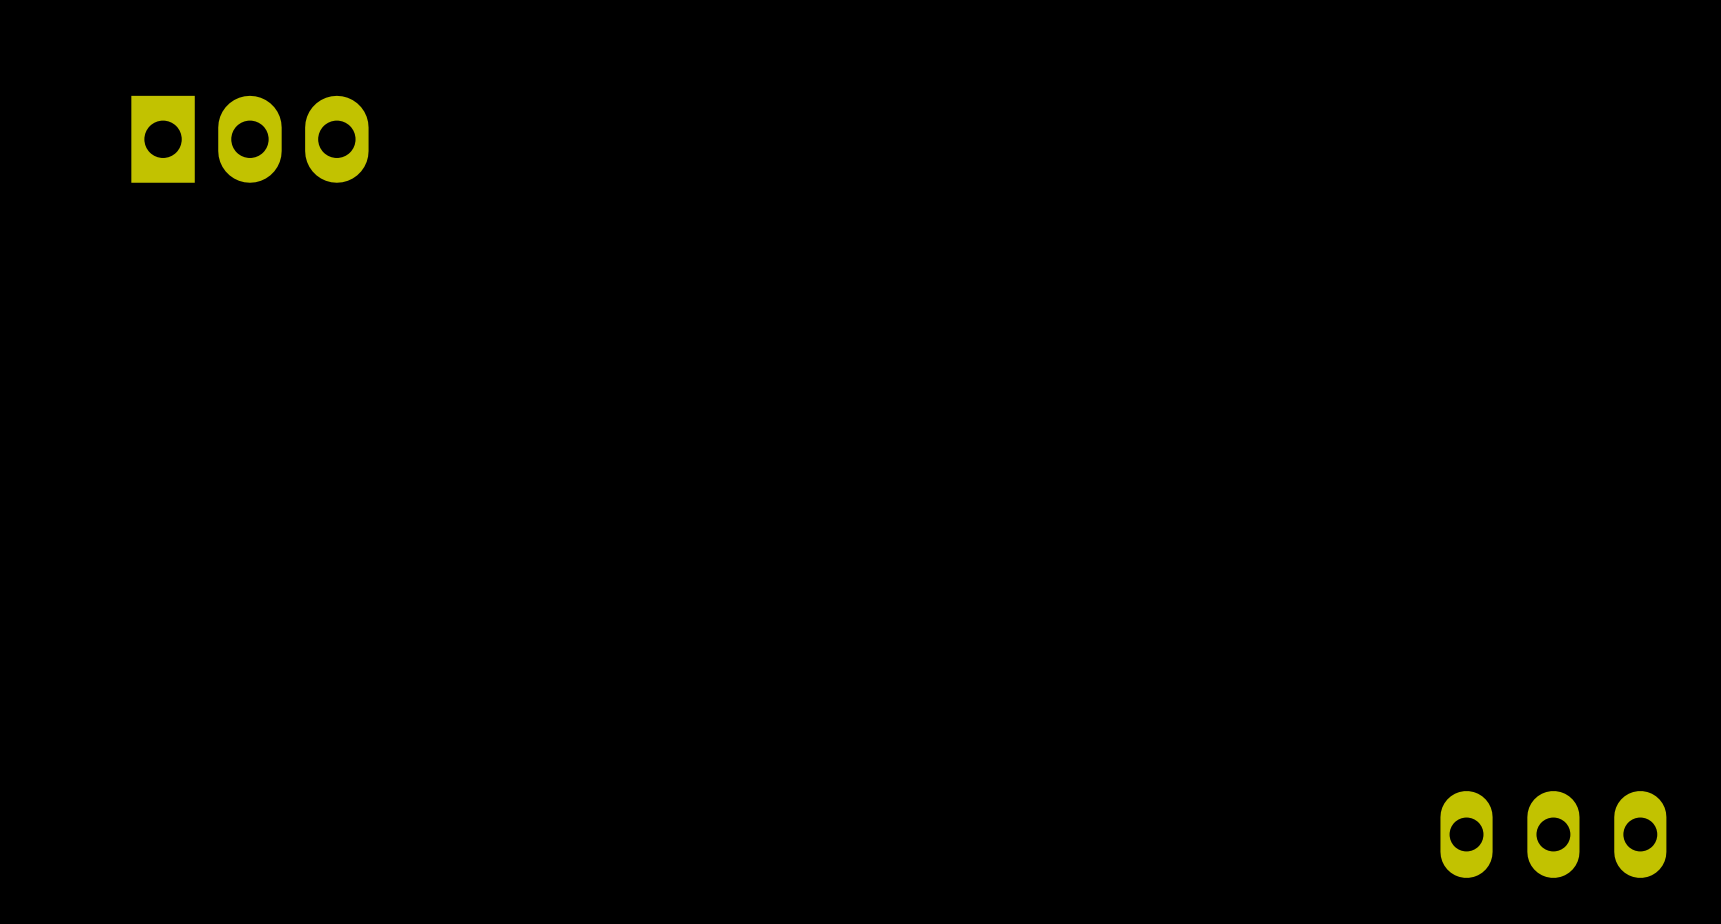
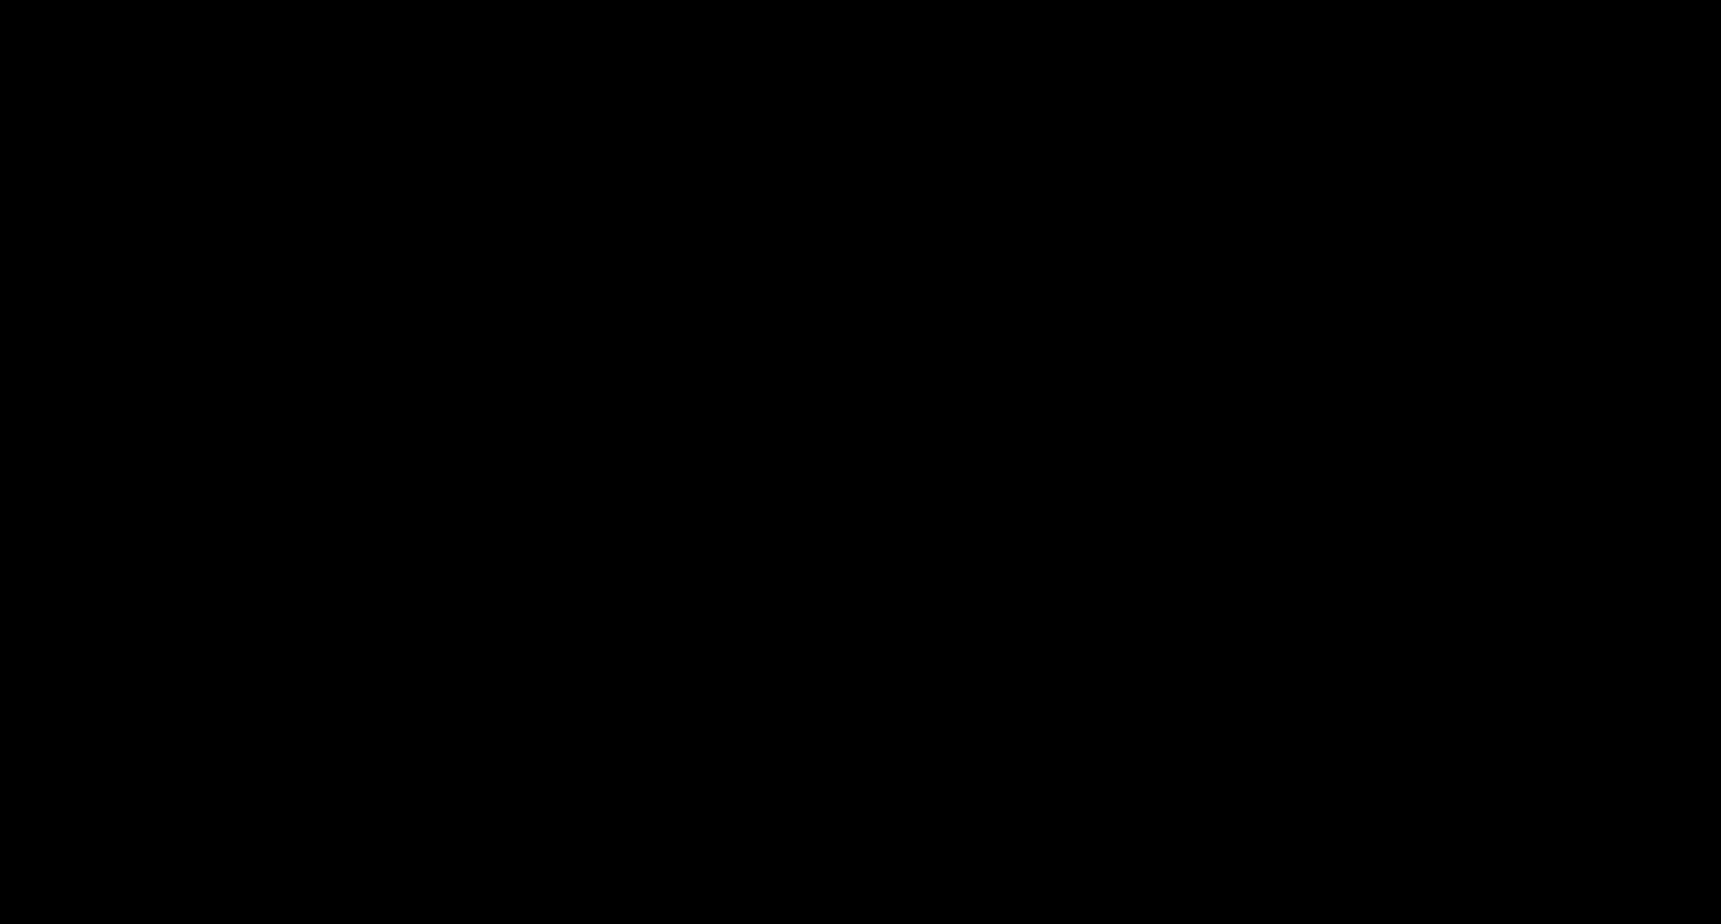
part: (249, 139) -> none
part: (1553, 834) -> none

